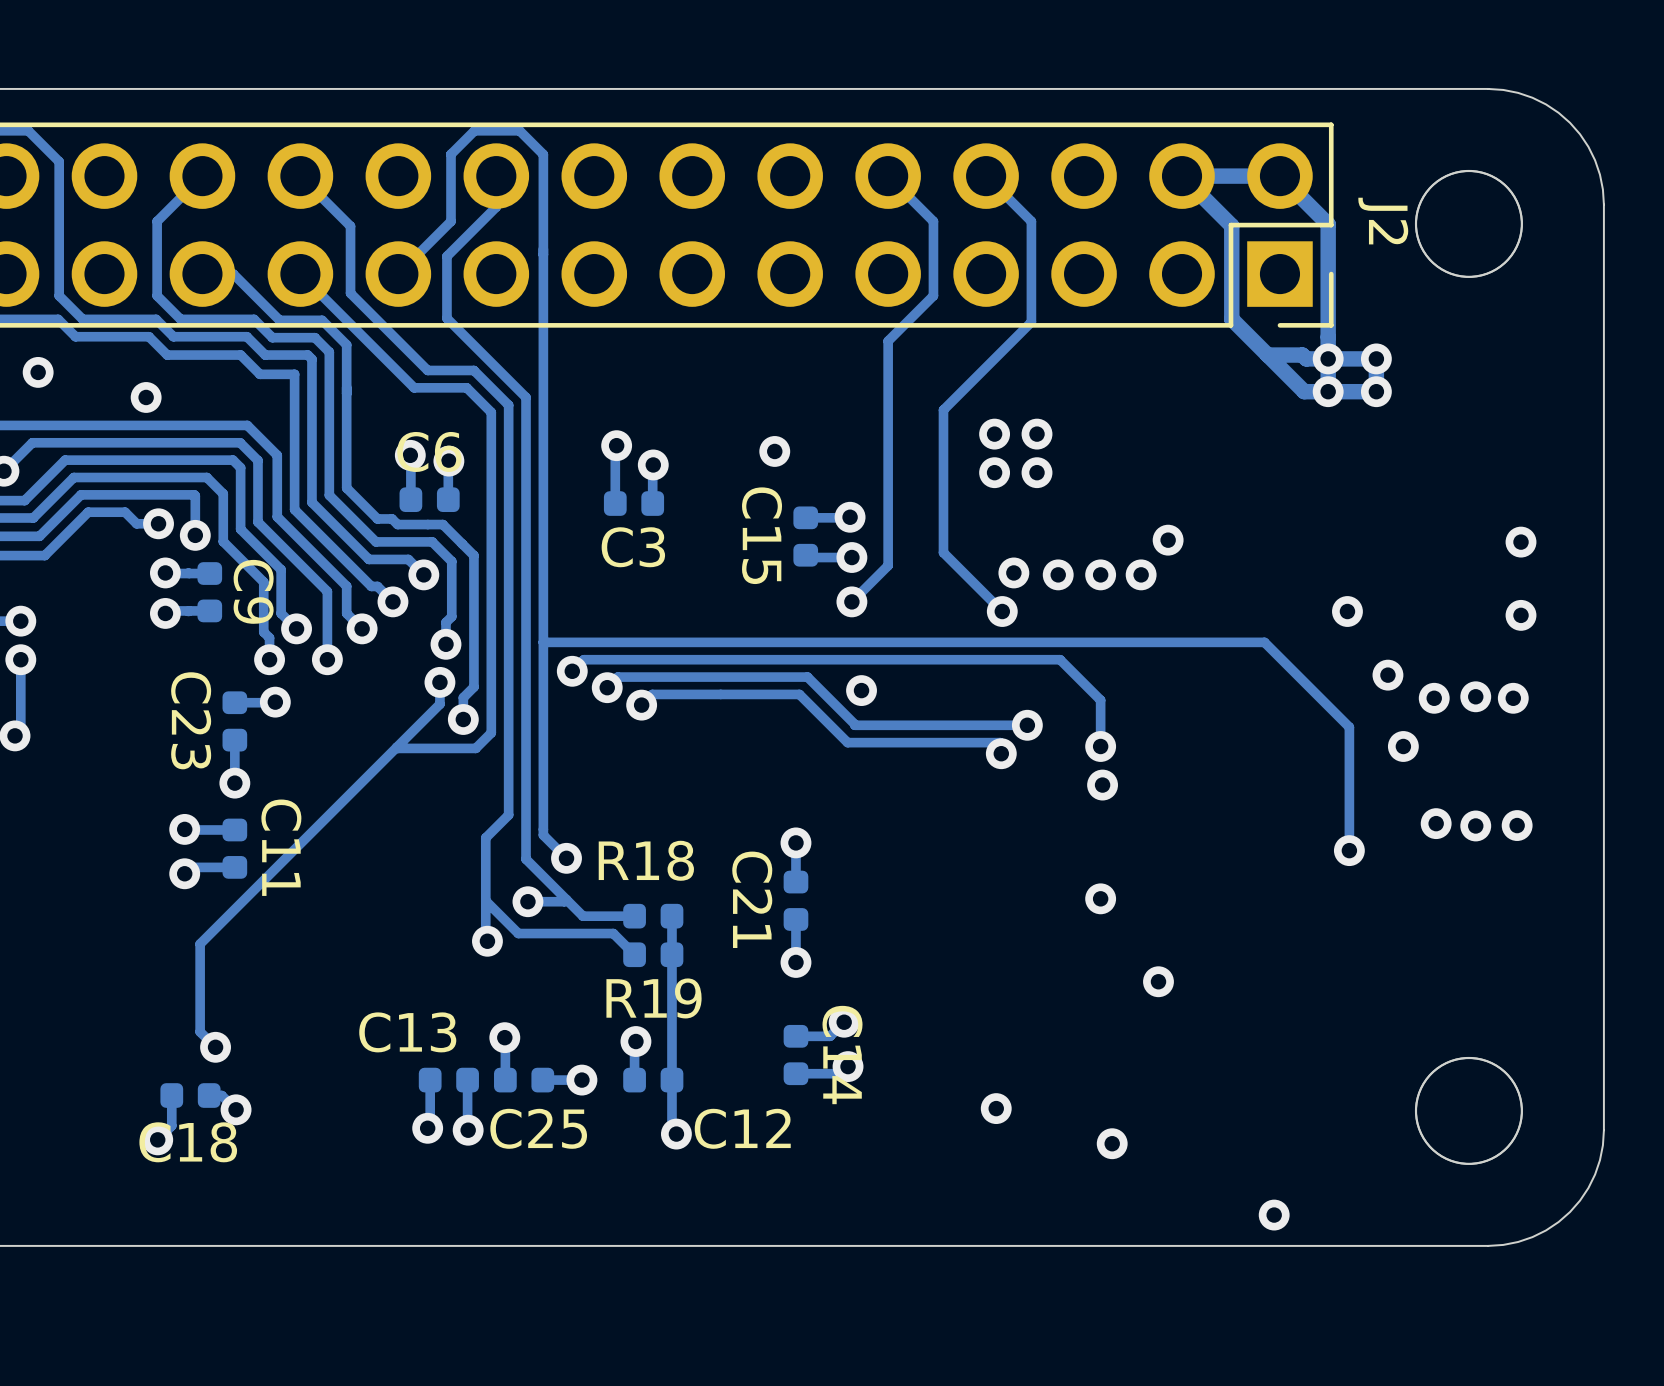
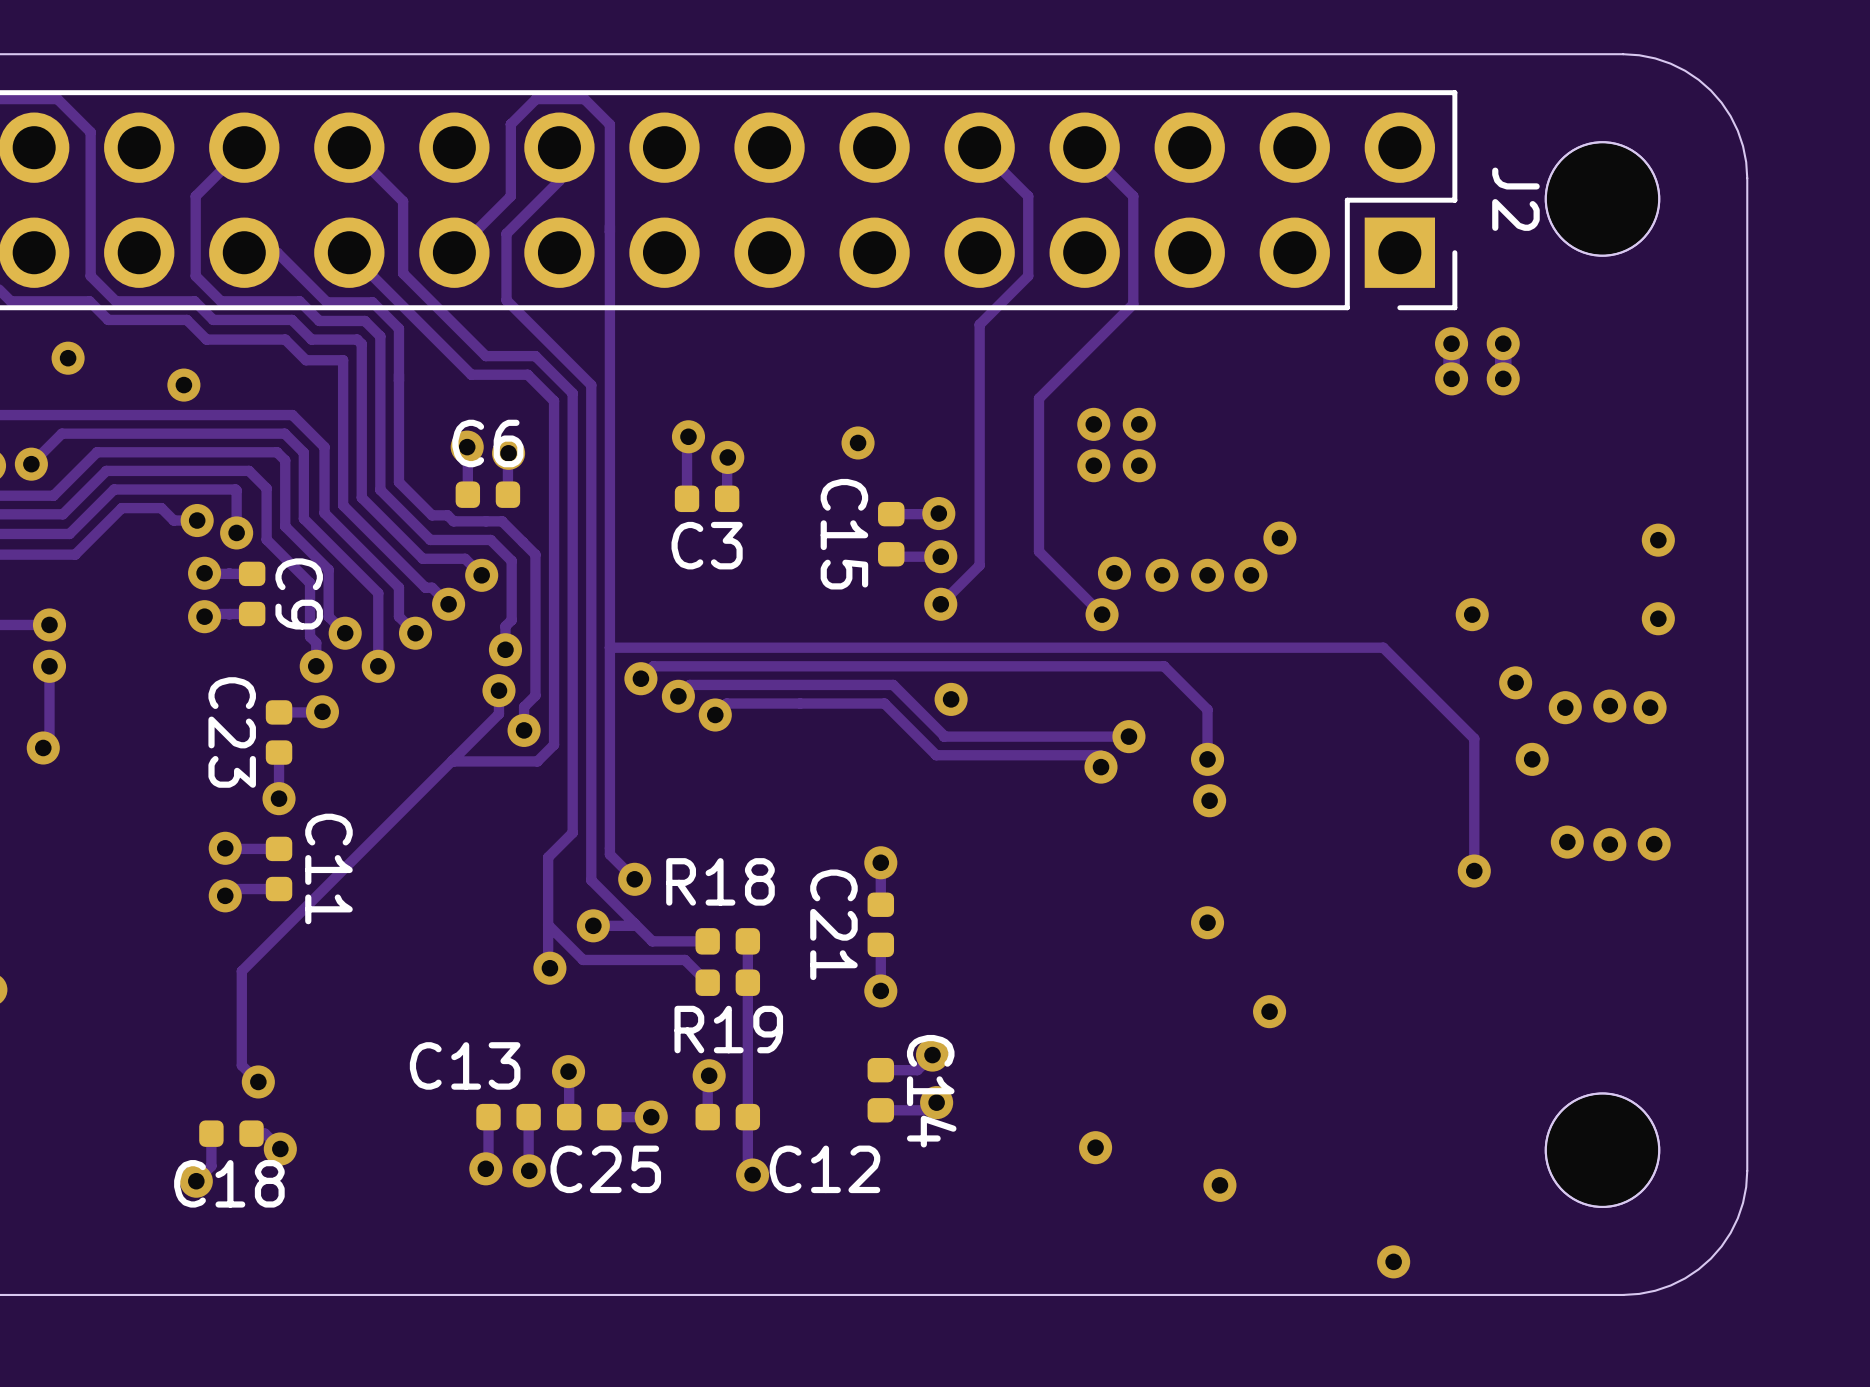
track: (1267, 355) (1302, 355) (1306, 358) (1376, 358) -> none
track: (1328, 358) (1328, 224) (1279, 176) (1182, 176) (1231, 225) (1231, 319) (1304, 391) (1376, 391) -> none

